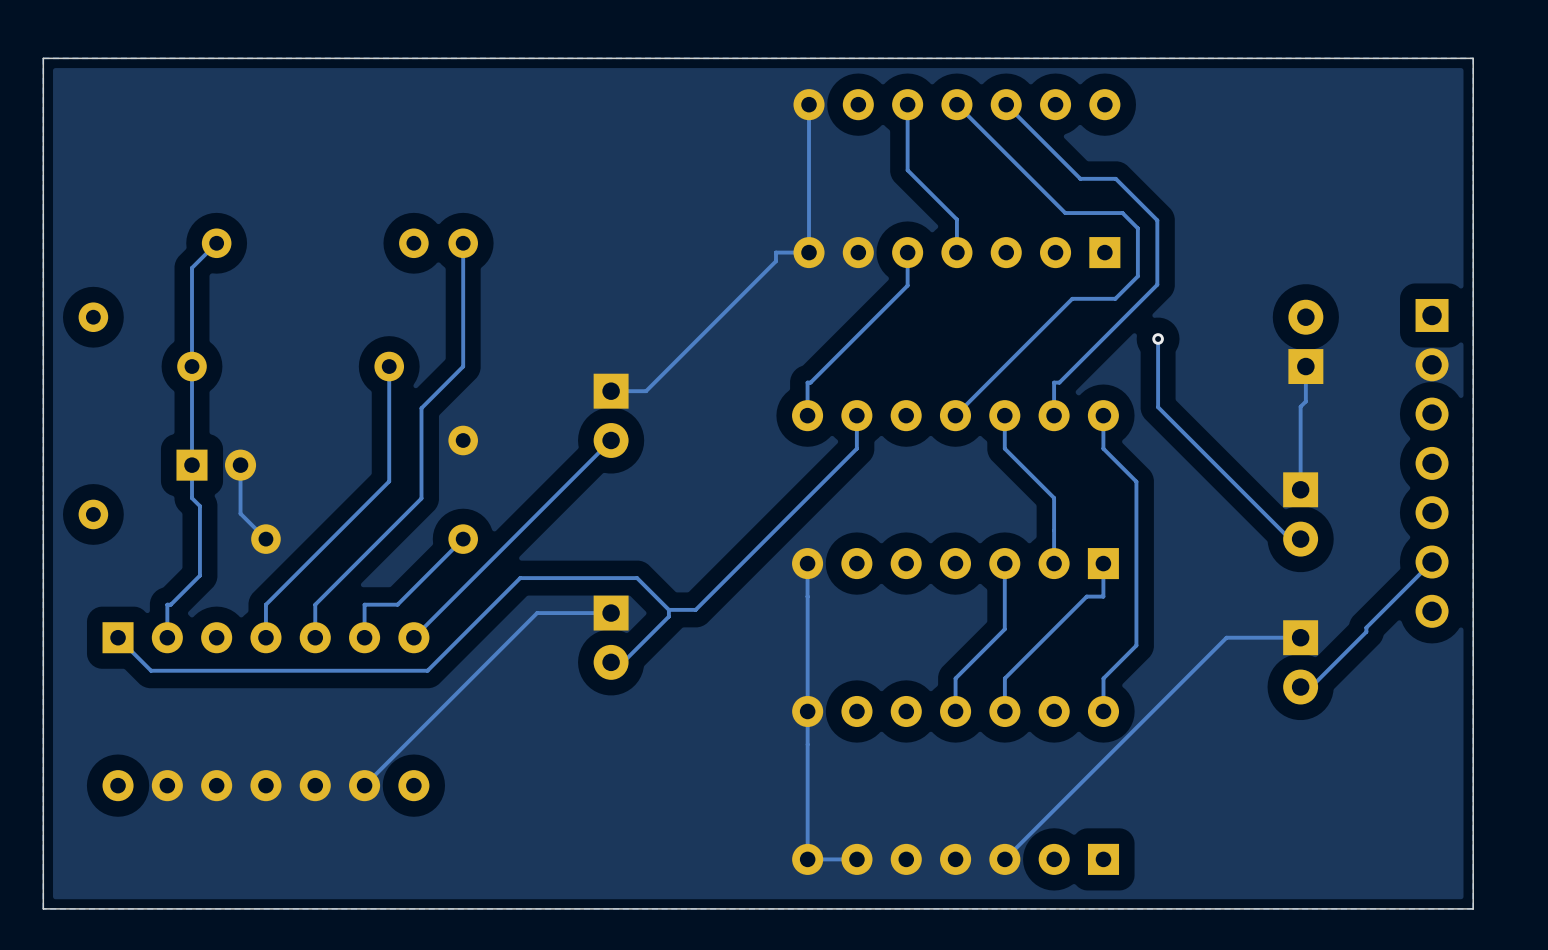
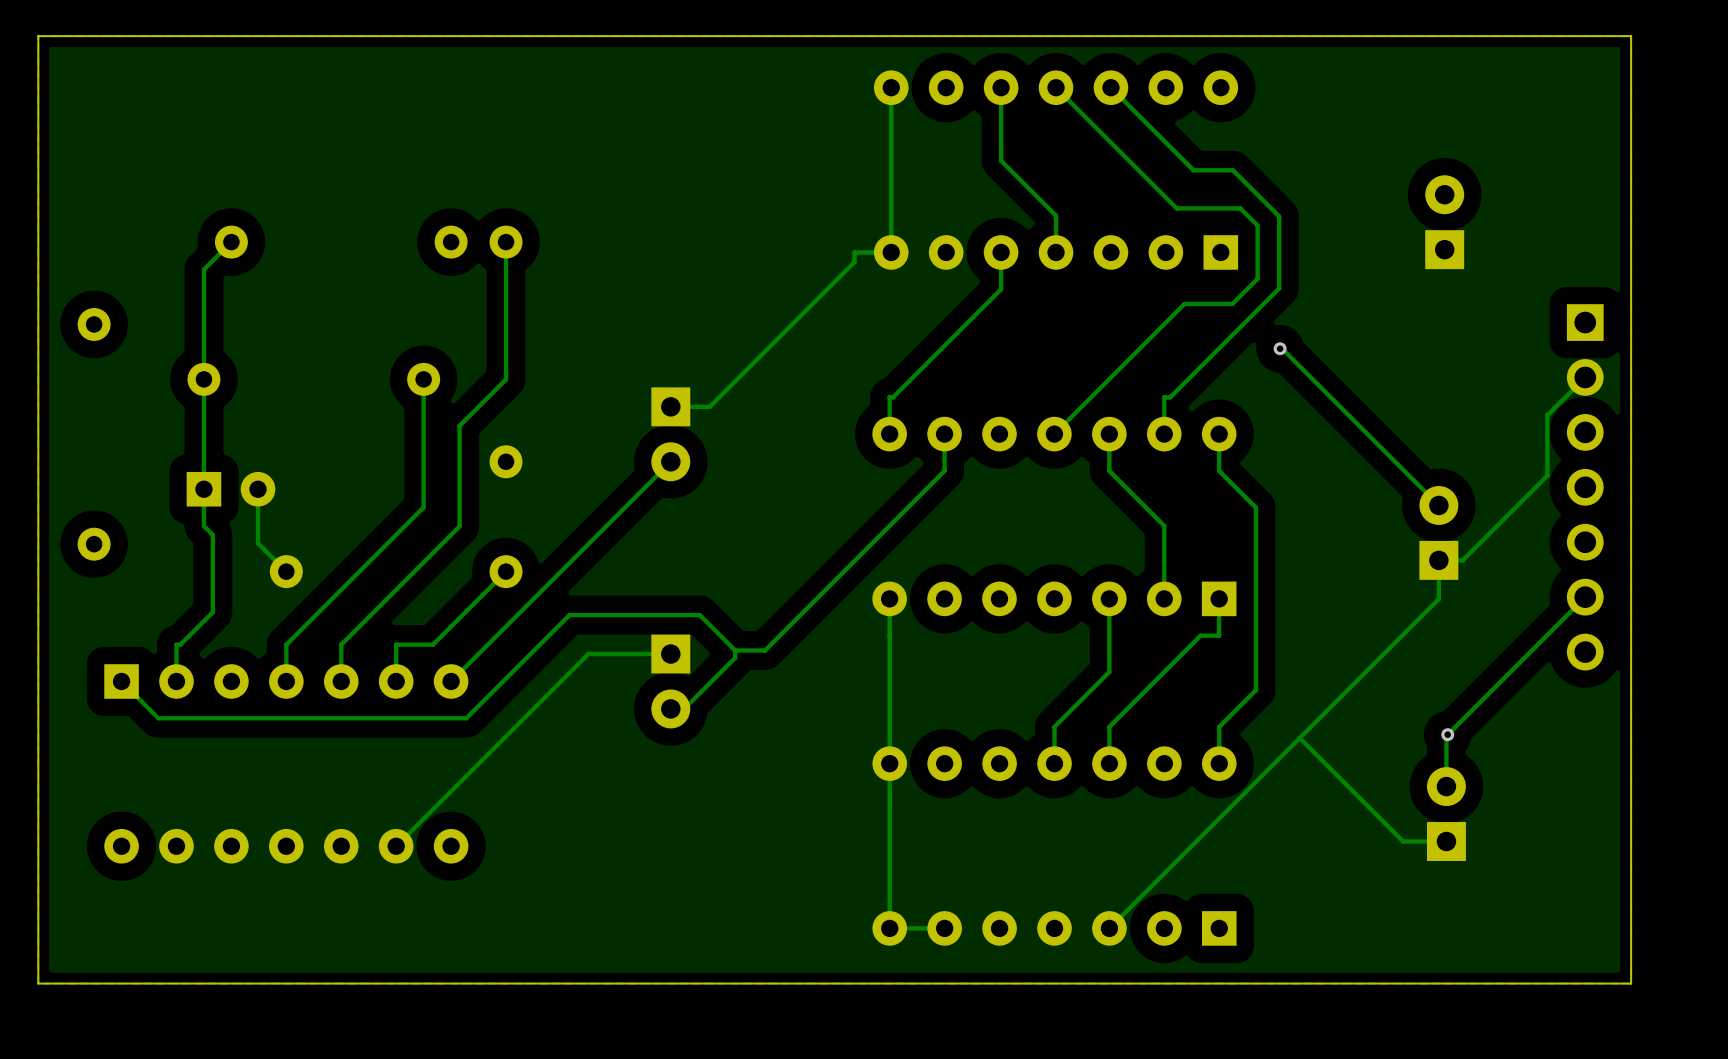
track: (1158, 339) (1158, 407) (1289, 539) (1300, 539) -> (1280, 348) (1438, 505)
part position: (1305, 341) -> (1444, 222)
track: (1305, 366) (1305, 401) (1300, 406) (1300, 489) -> none
part rotation: 0° (1300, 514) -> 180° (1438, 532)
track: (1366, 627) (1366, 631) (1311, 687) (1300, 687) -> (1512, 670) (1446, 735) (1446, 786)
track: (1300, 637) (1226, 637) -> (1585, 377) (1547, 415) (1547, 475) (1462, 560) (1438, 560) (1438, 598) (1356, 681)
part rotation: 0° (1300, 662) -> 180° (1446, 814)
part position: (1300, 662) -> (1446, 814)
via: none -> (1447, 734)
track: none -> (1299, 738) (1403, 841) (1446, 841)

